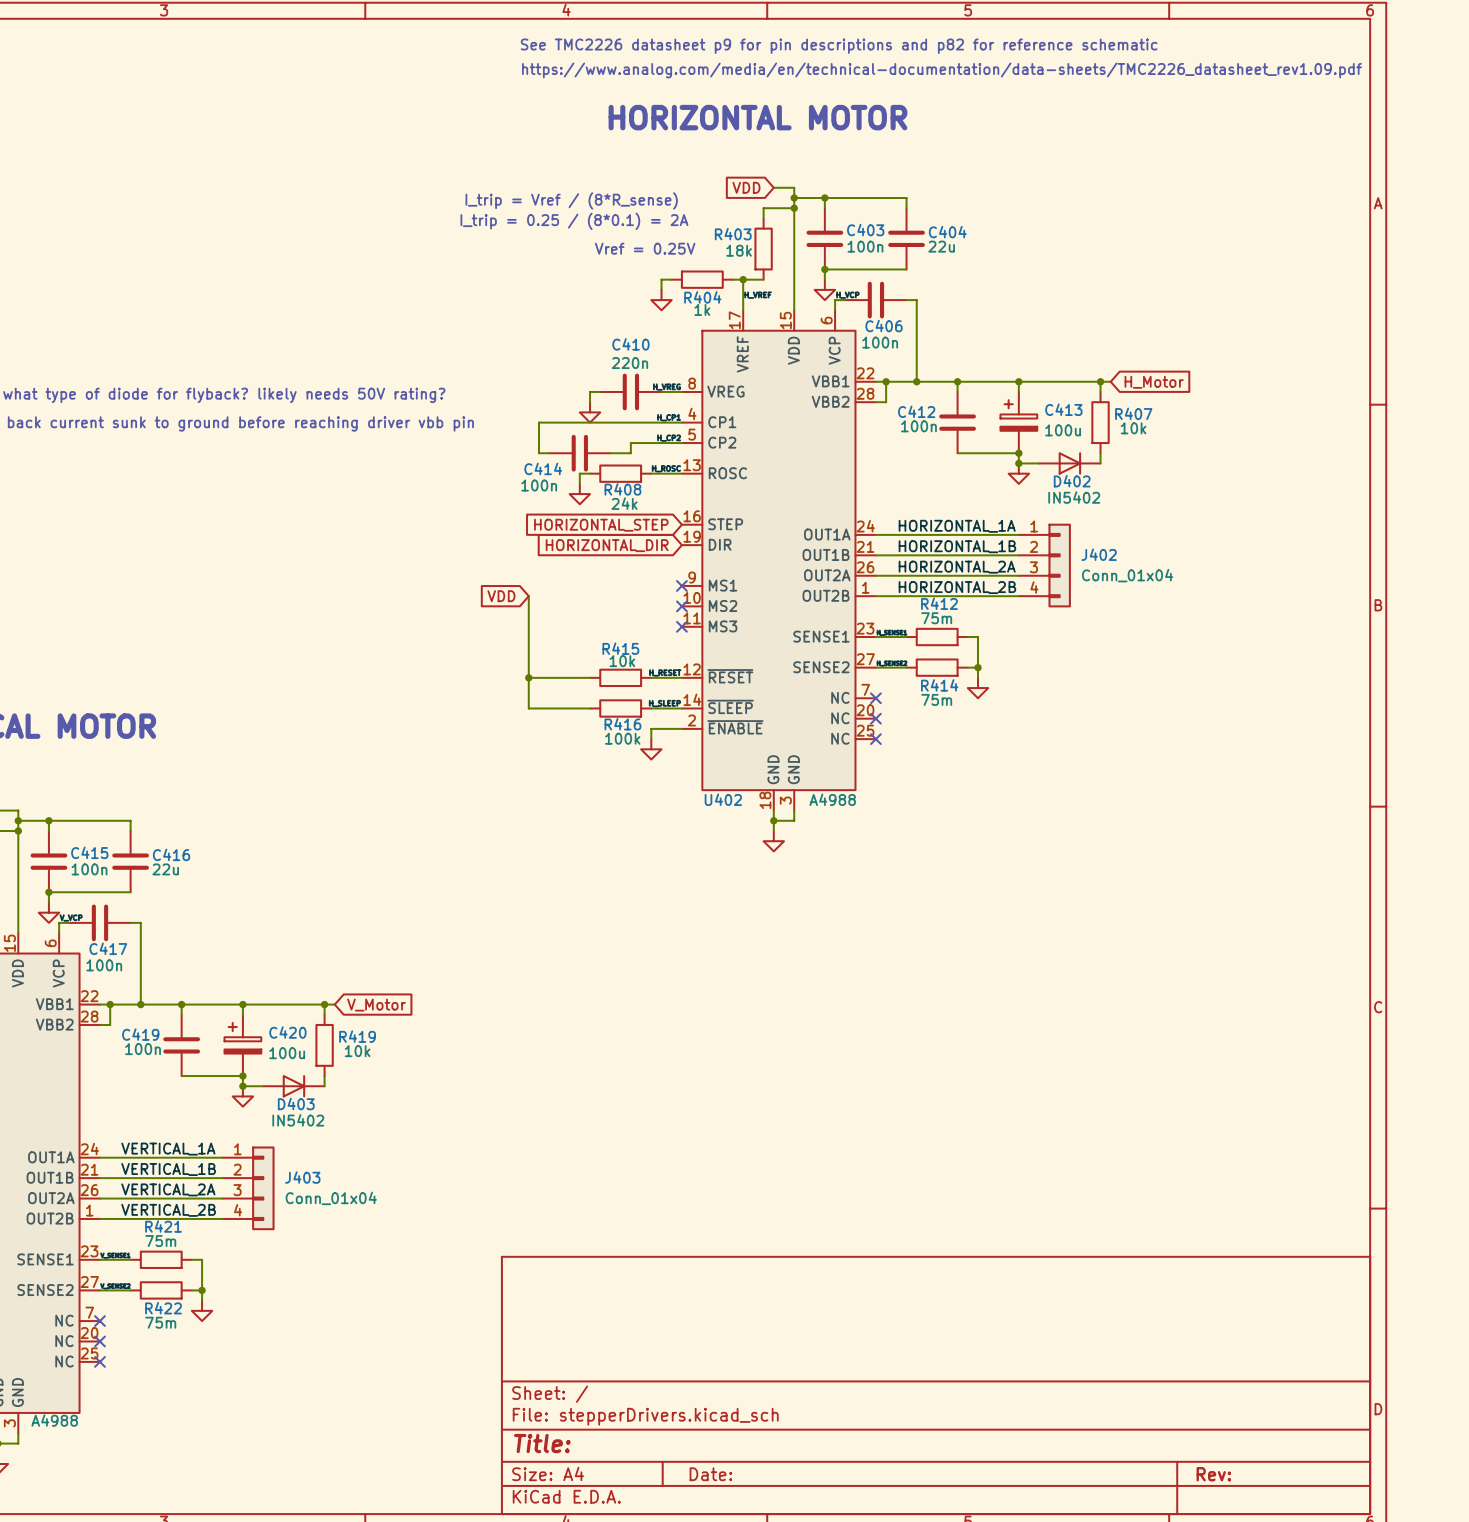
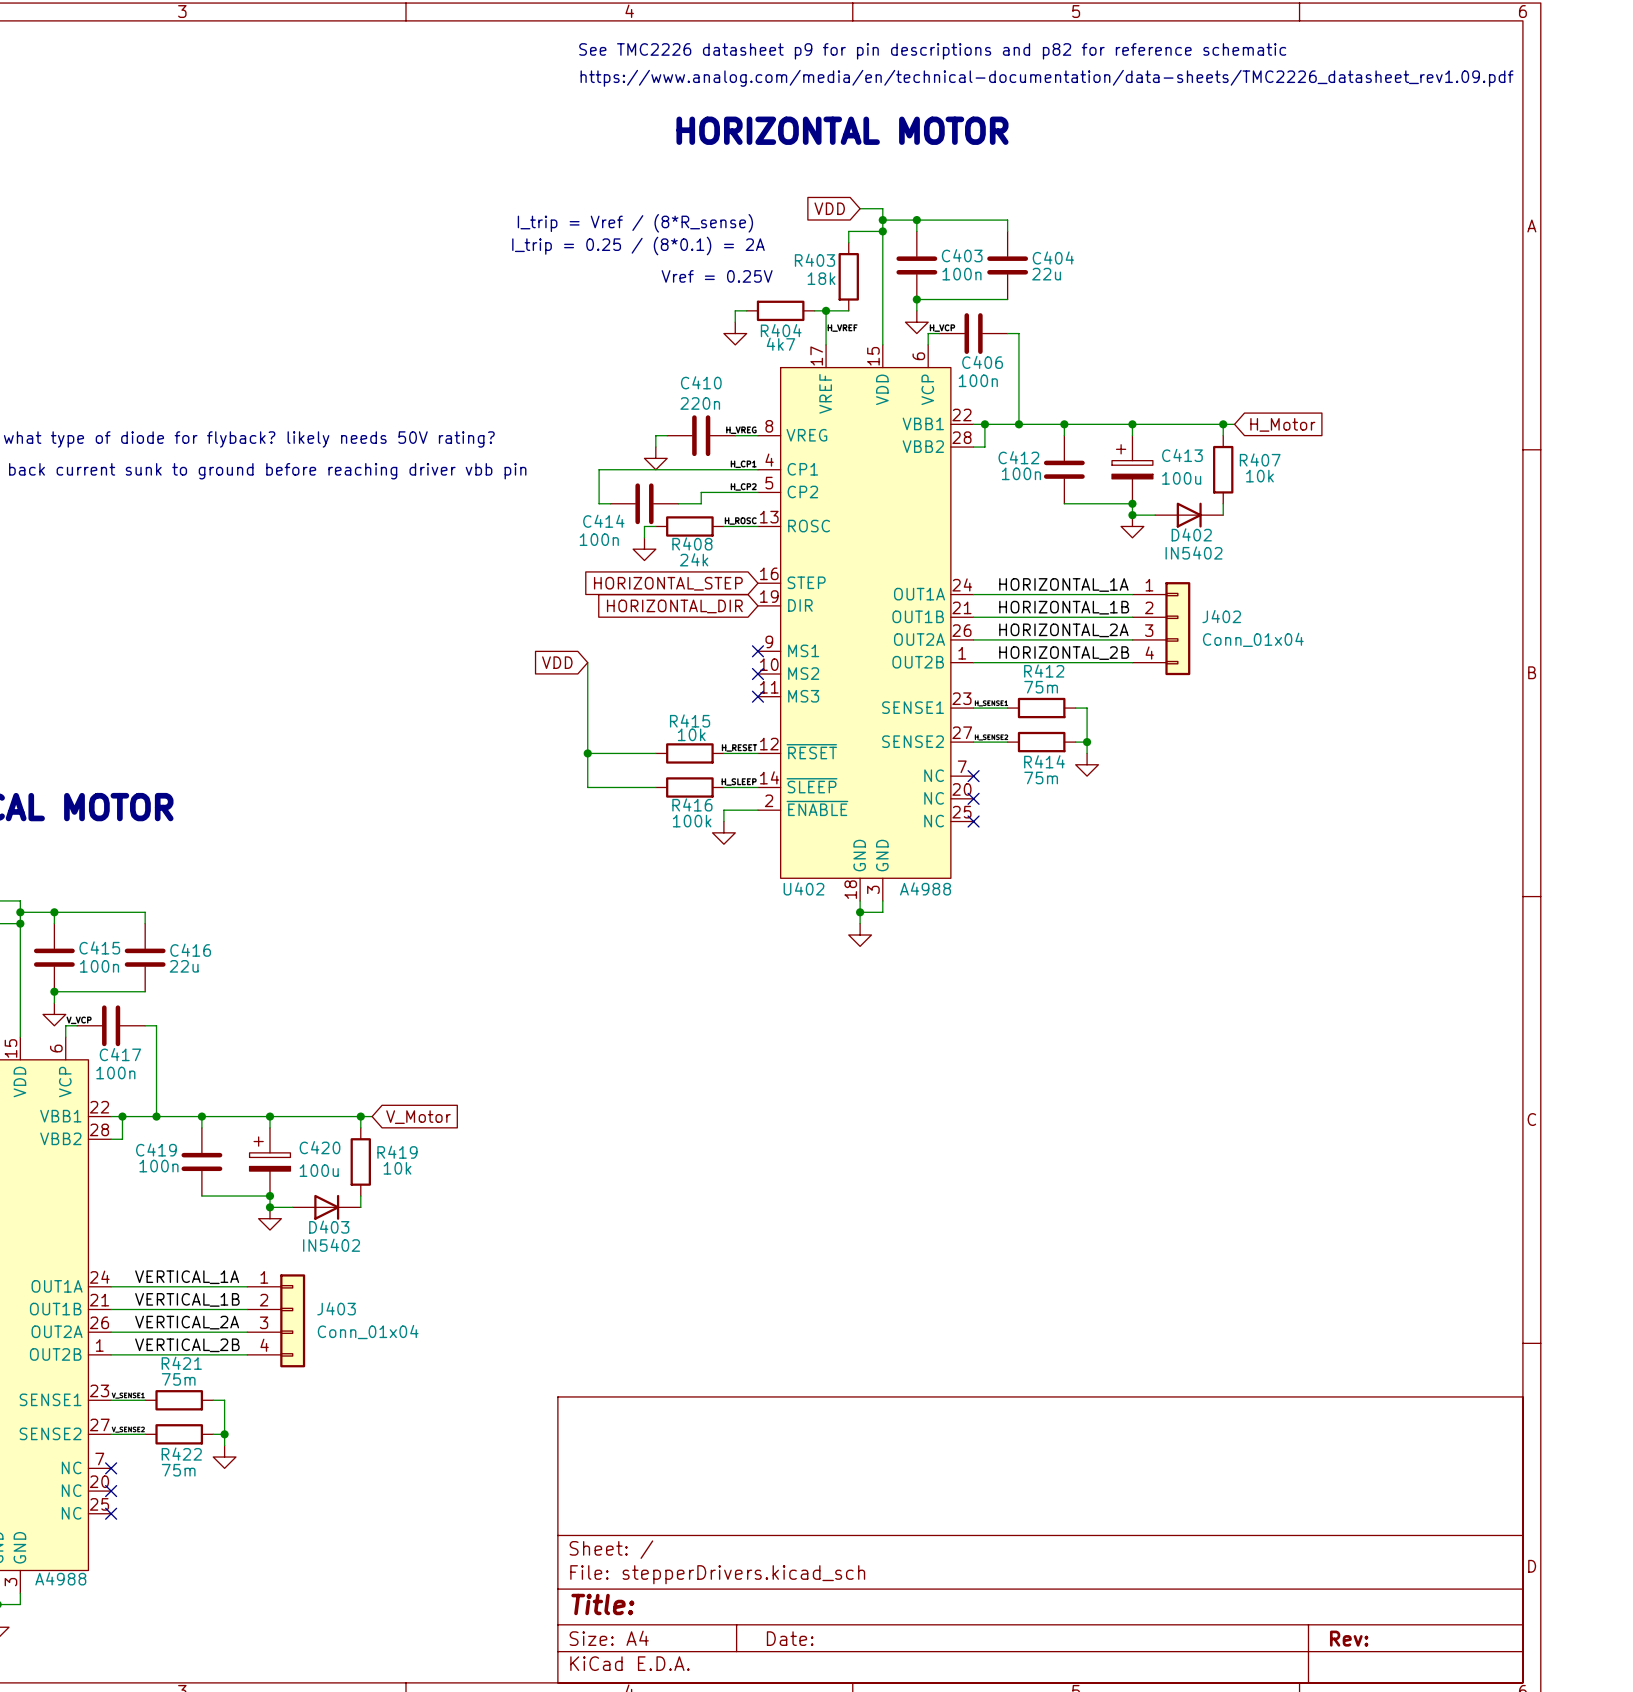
R404 value: 1k (702, 309) -> 4k7 (780, 344)

